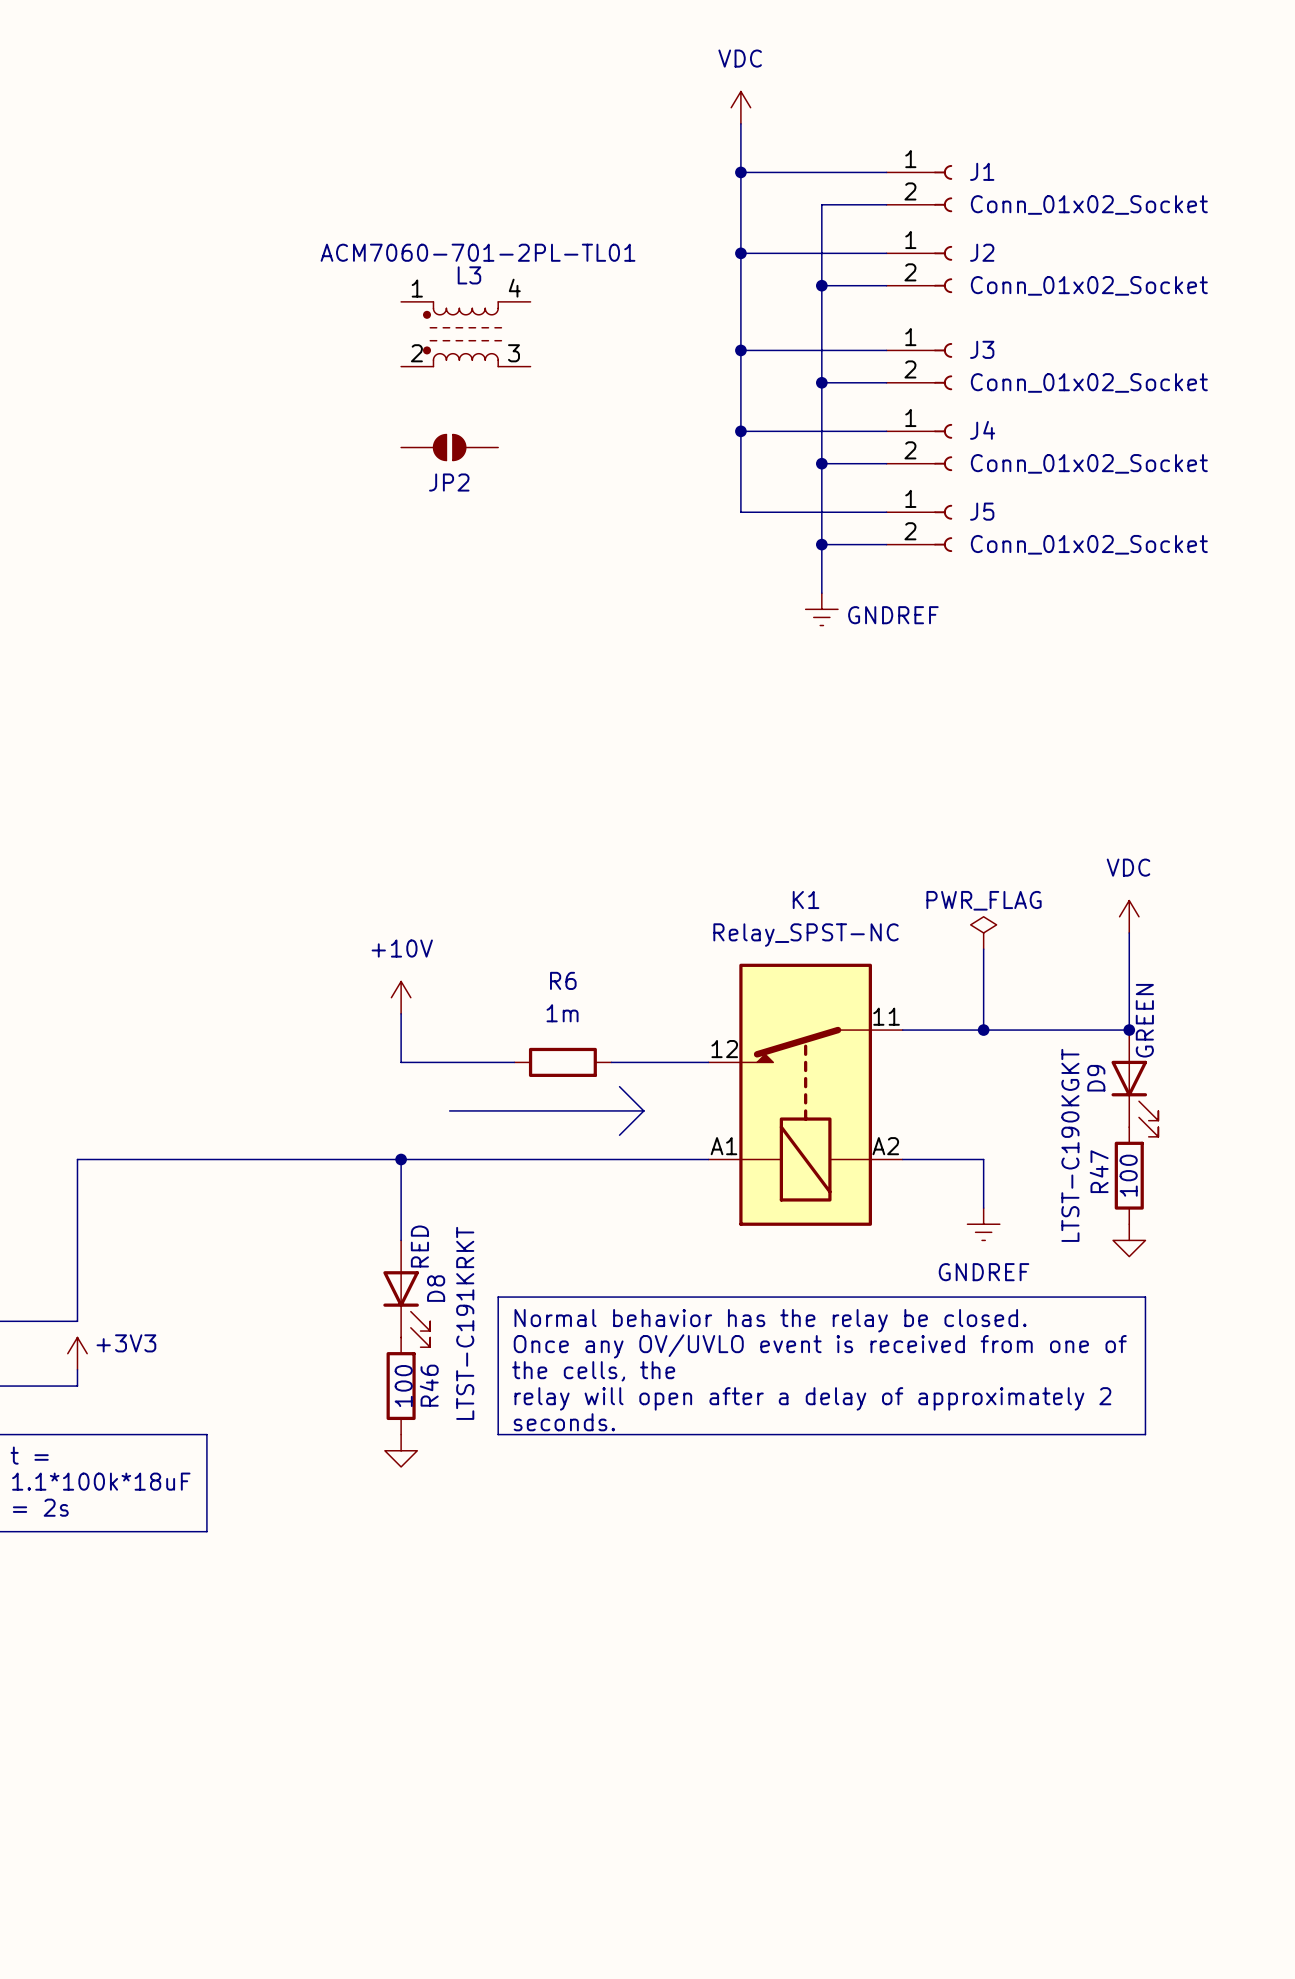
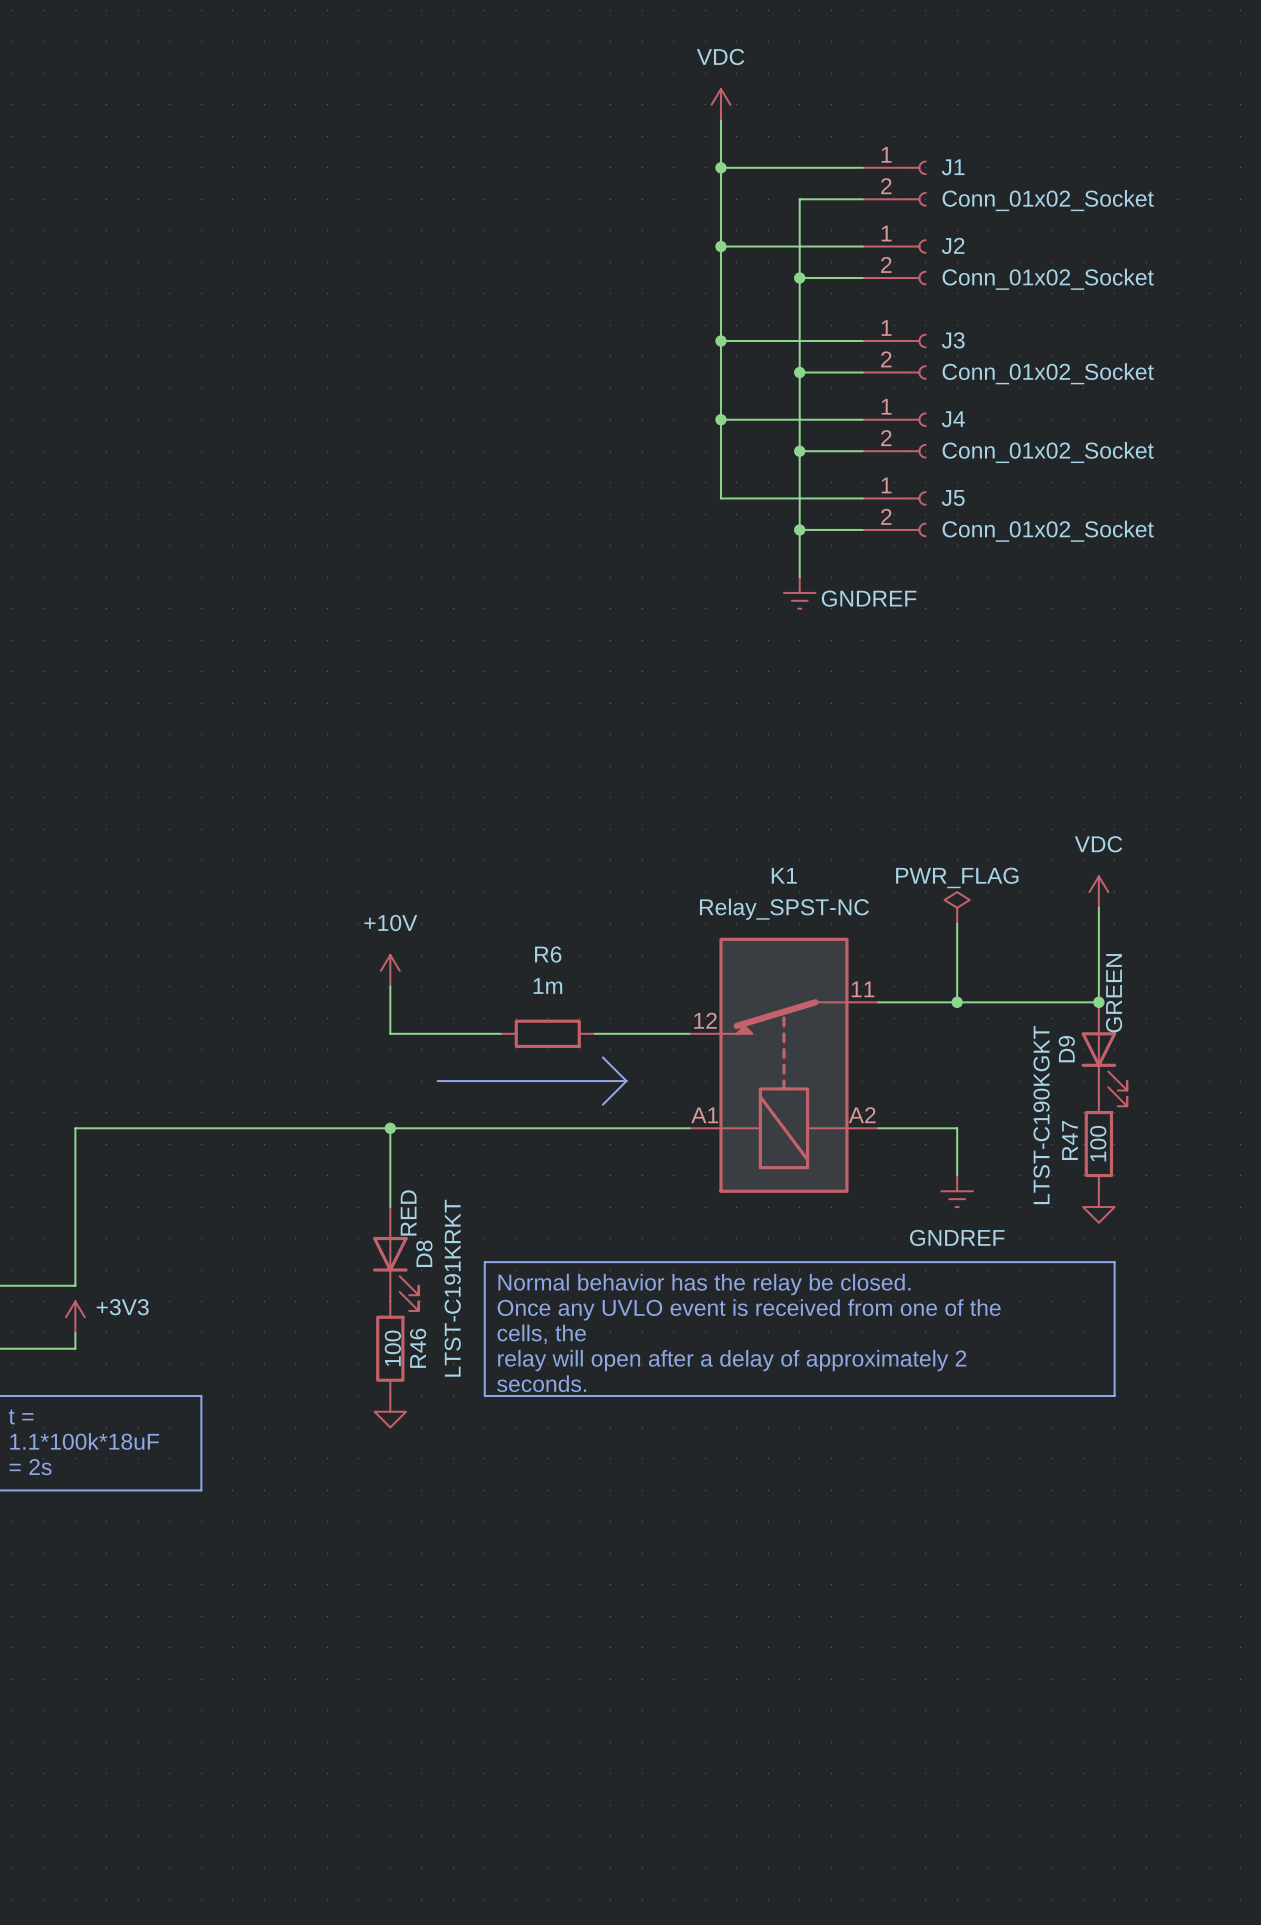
L3: (465, 334) -> none
JP2: (449, 447) -> none
text: Once any OV/UVLO event is received from one of (820, 1346) -> Once any UVLO event is received from one of the (749, 1309)
text: the cells, the (593, 1371) -> cells, the (541, 1334)

